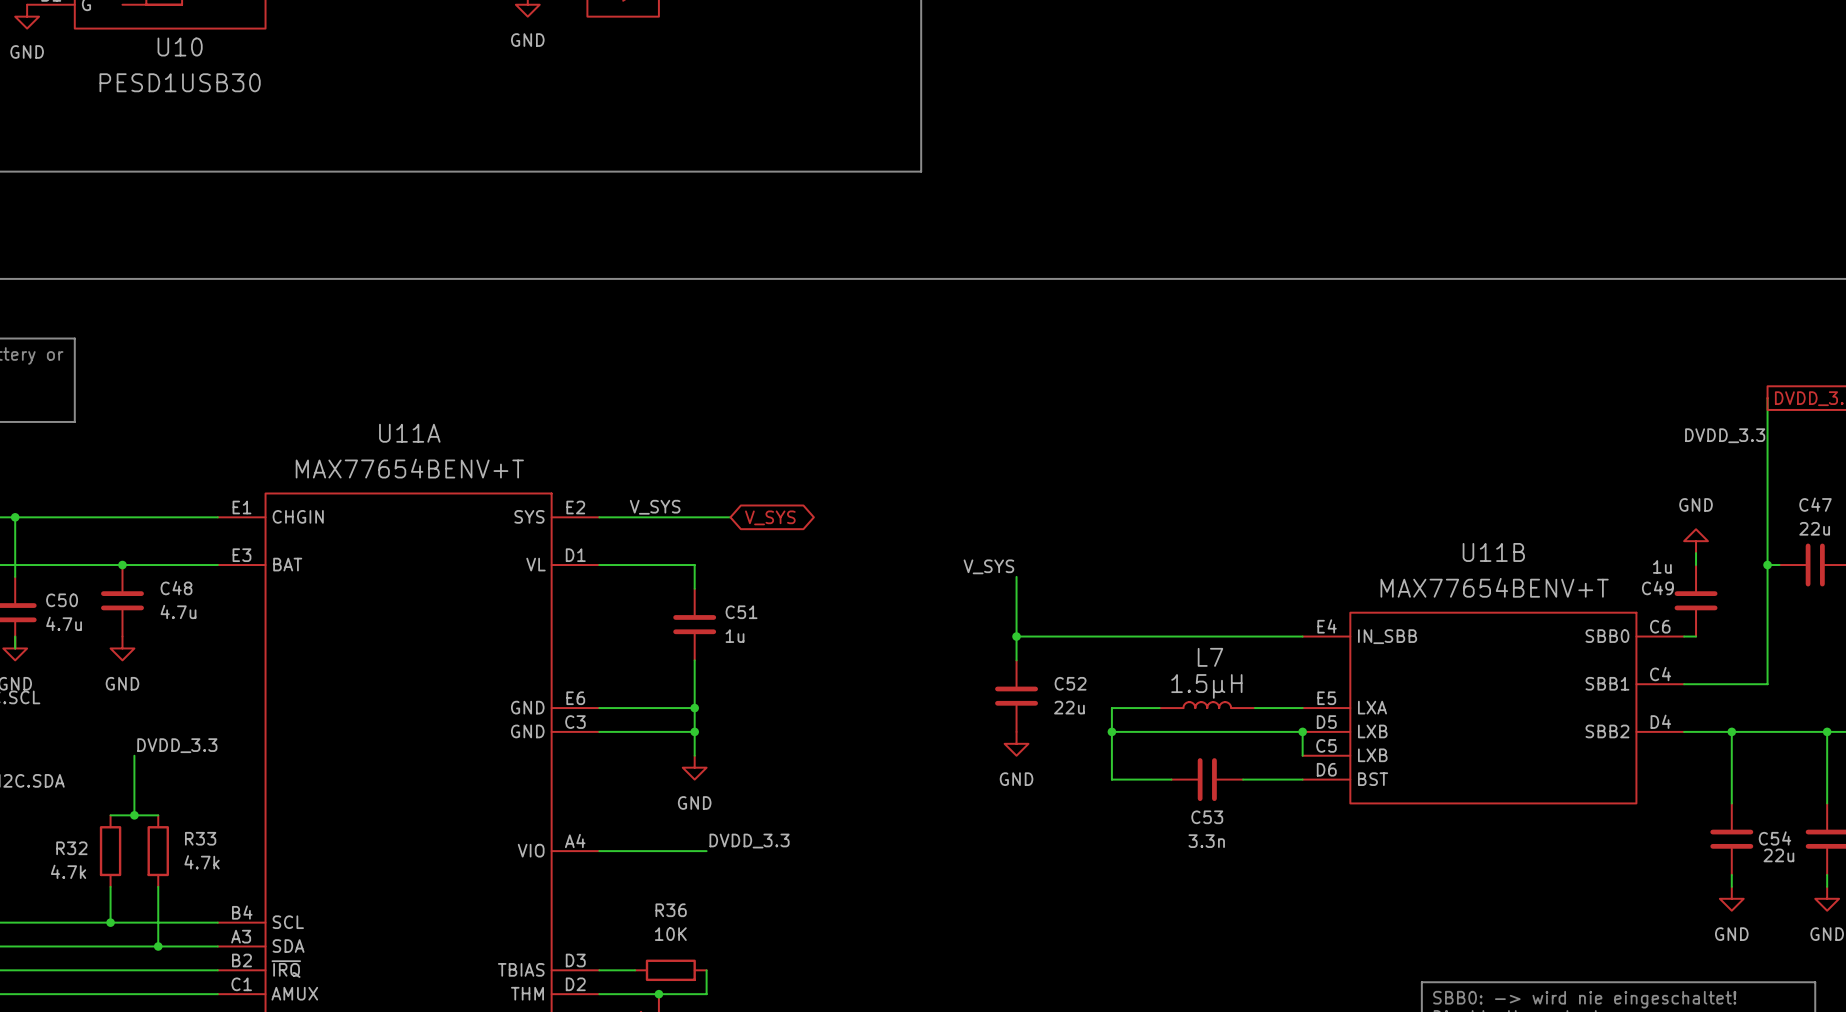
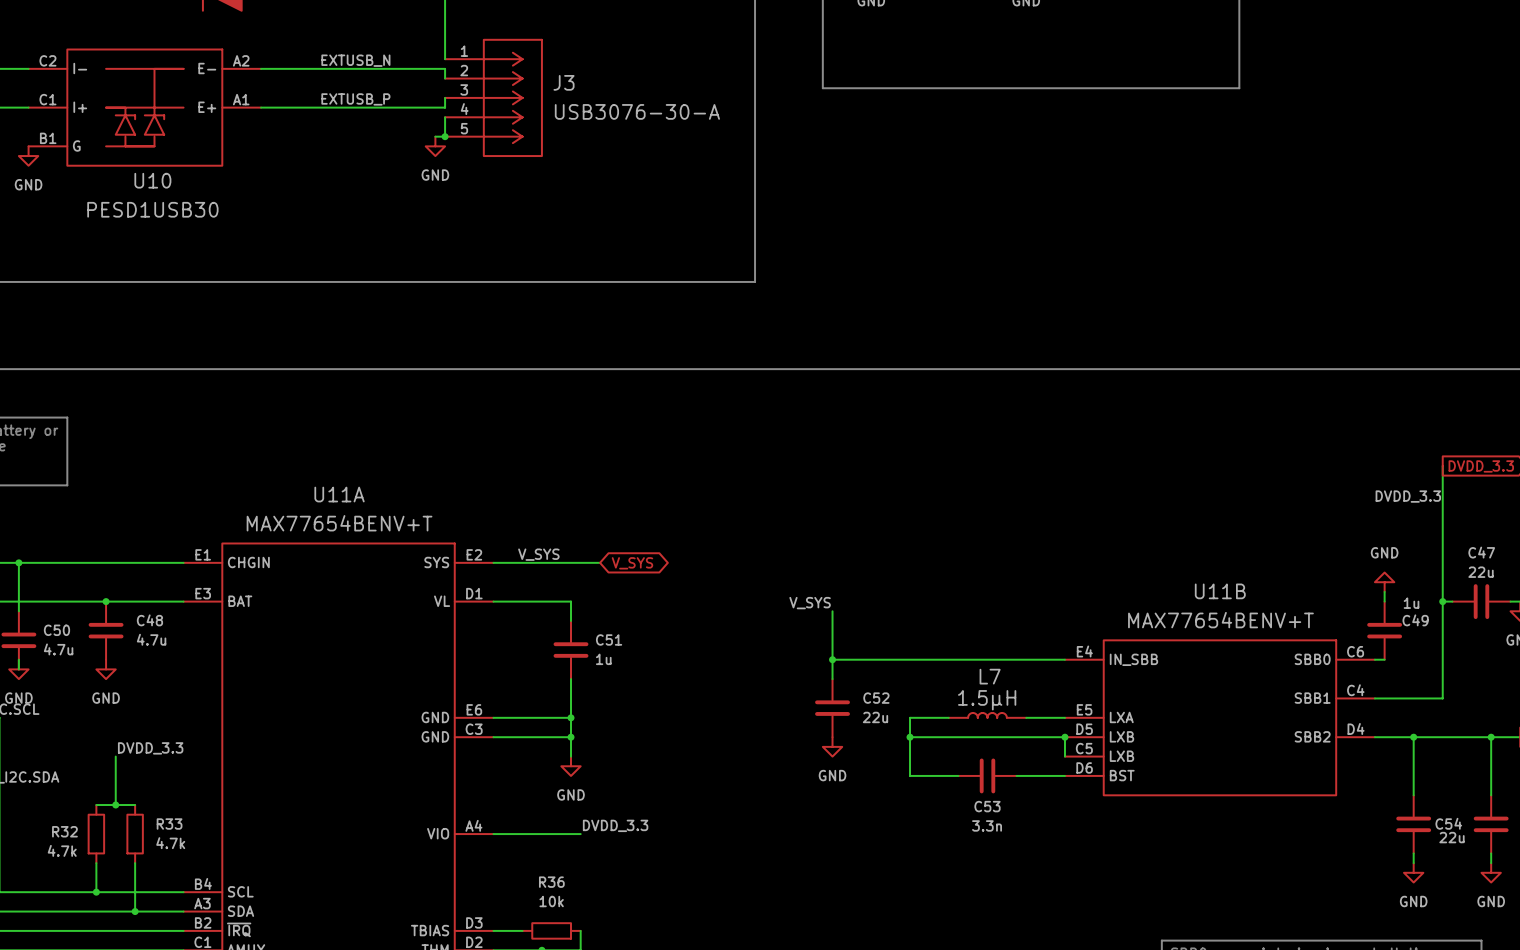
C49 value position: 1u (1662, 566) -> 1u (1411, 603)
C49 name position: C49 (1657, 588) -> C49 (1415, 620)
R36 value: 10K (670, 934) -> 10k (551, 901)

